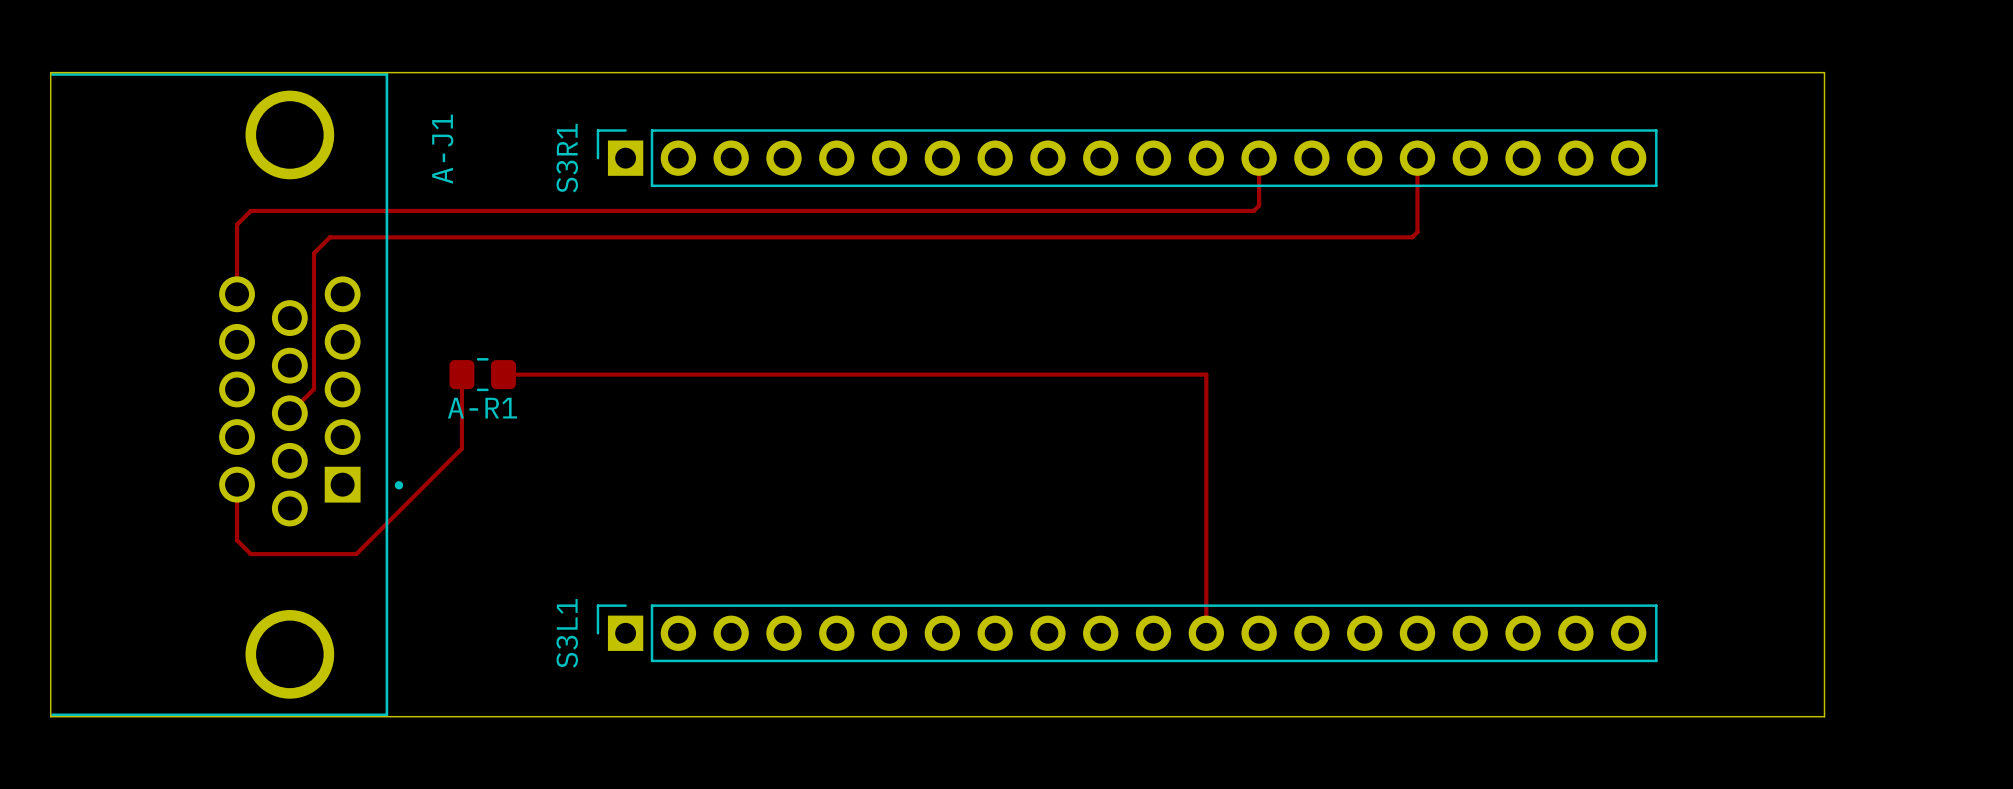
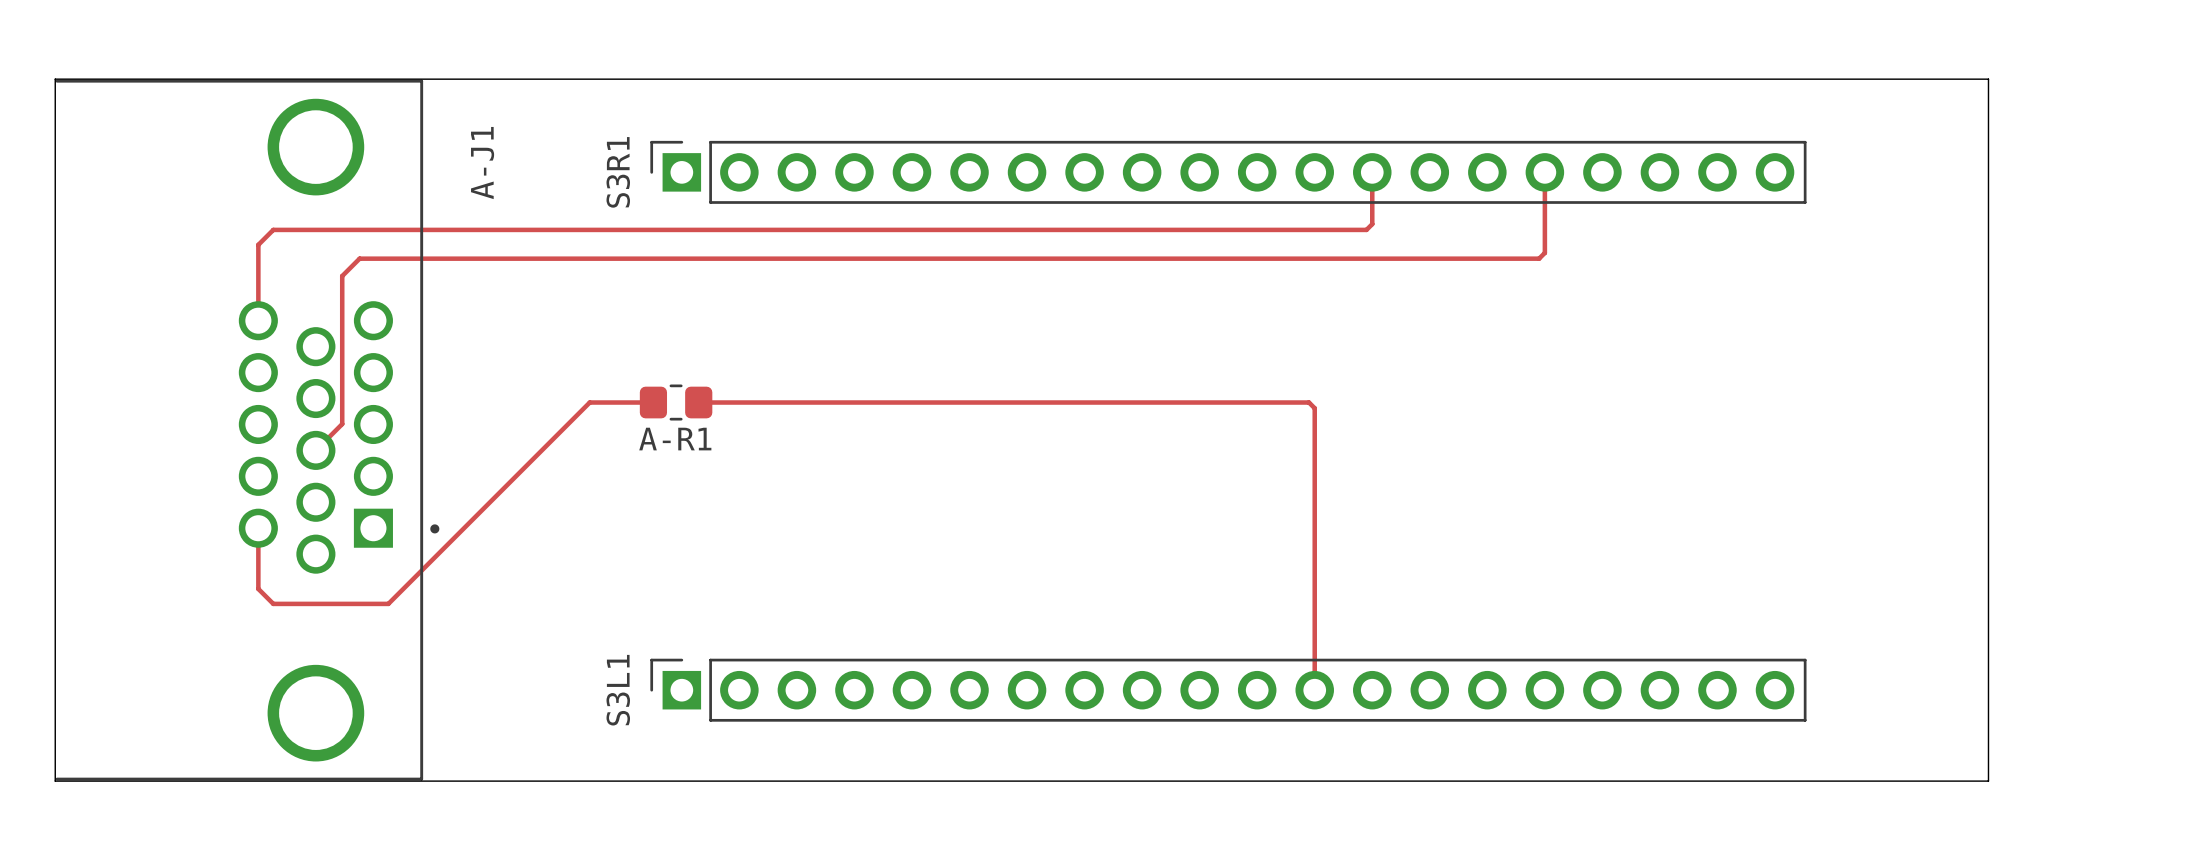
track: (461, 374) (461, 448) -> (653, 402) (589, 402) (503, 488)
A-R1 position: (482, 374) -> (676, 402)
track: (503, 374) (1206, 374) -> (698, 402) (1308, 402) (1314, 408)

